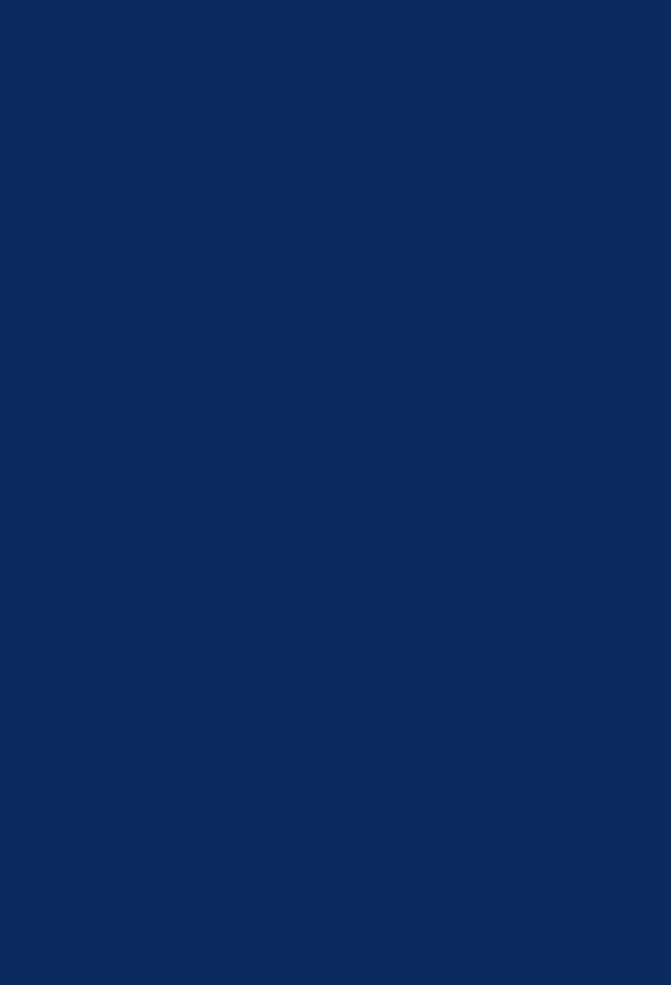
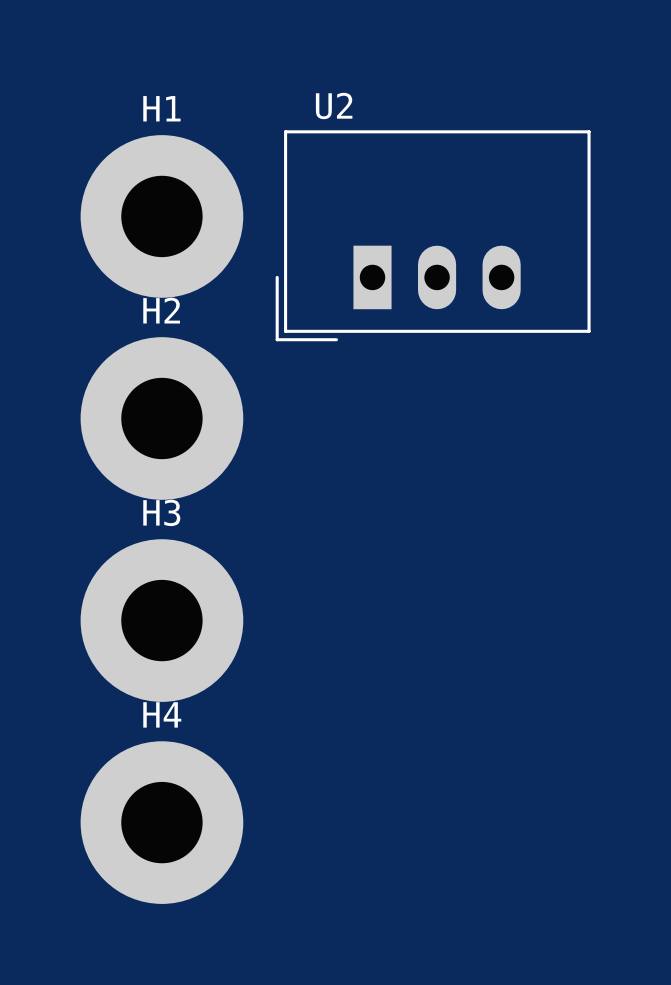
H1: none -> (161, 216)
U2: none -> (433, 235)
H2: none -> (161, 418)
H3: none -> (161, 620)
H4: none -> (161, 822)

